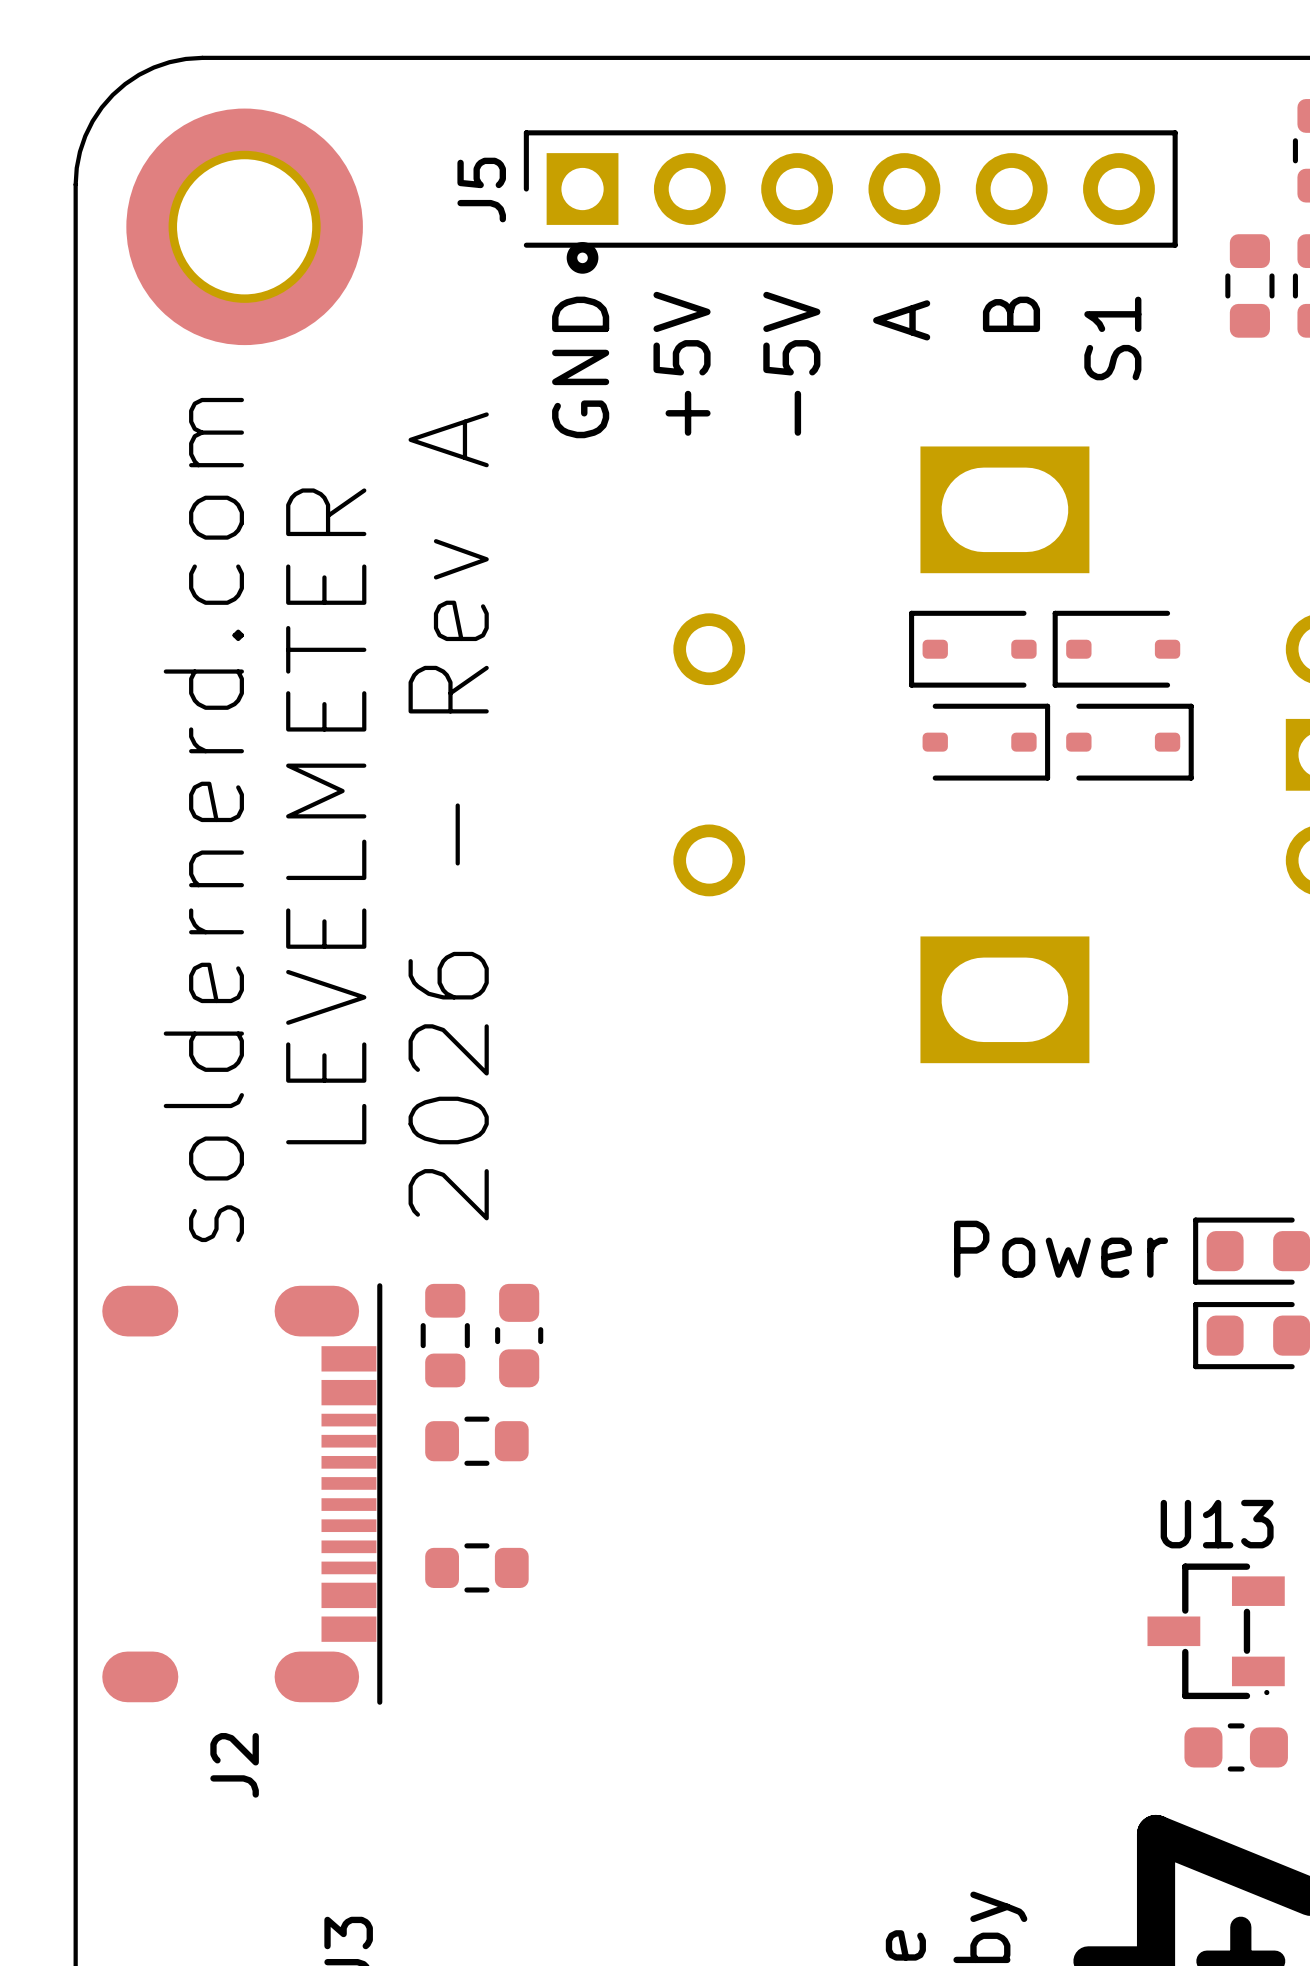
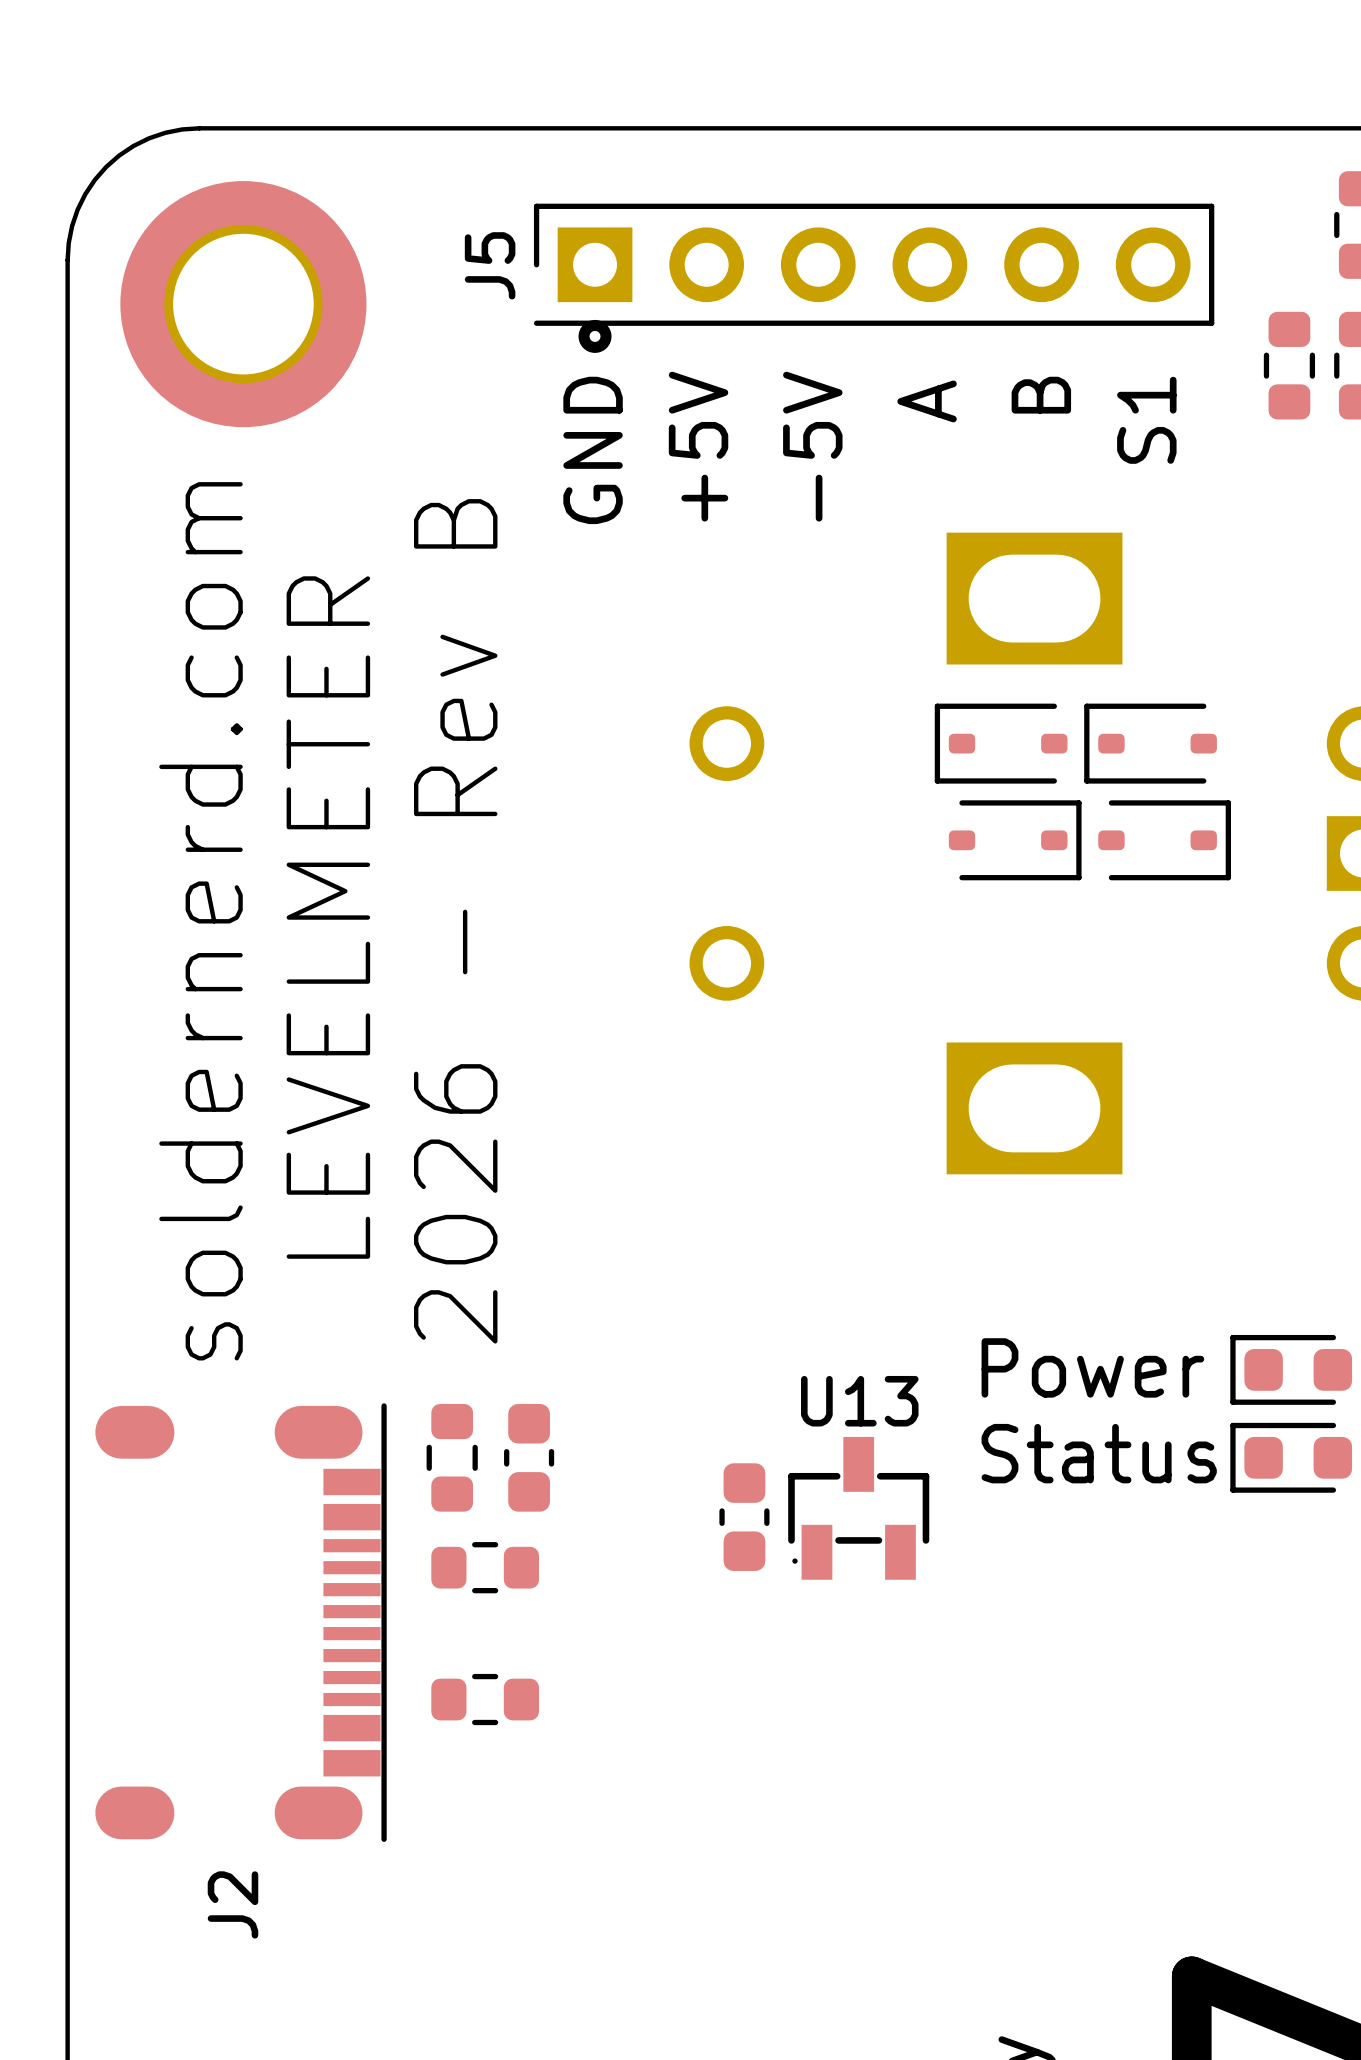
text: 2026 - Rev A (448, 816) -> 2026 - Rev B (455, 921)
text: none -> Status (1099, 1453)
U13 rotation: 0° (1216, 1631) -> 90° clockwise (858, 1508)
U13 position: (1216, 1631) -> (858, 1508)
part rotation: 0° (1236, 1747) -> 90° clockwise (744, 1517)
part position: (1236, 1747) -> (744, 1517)

